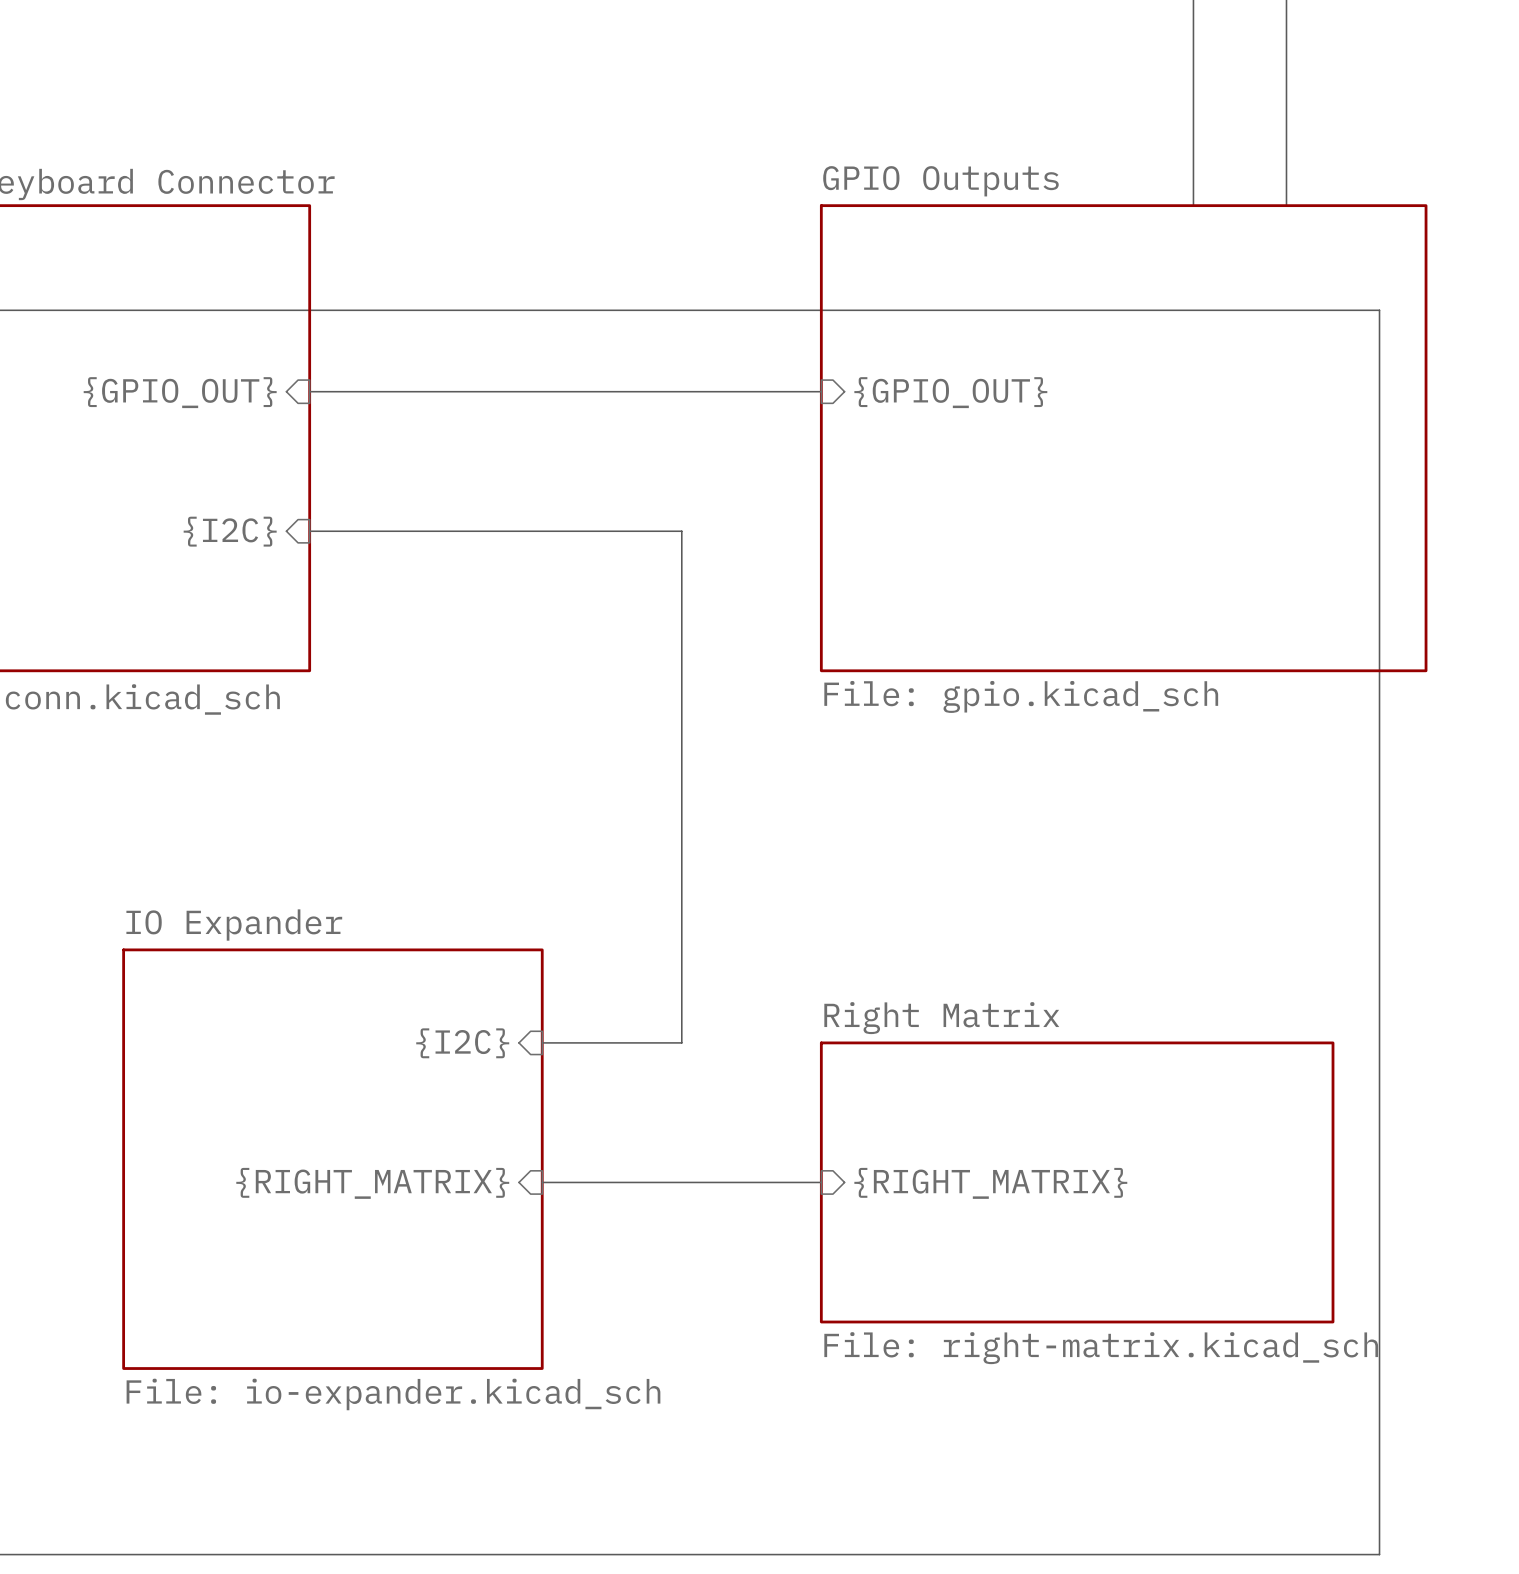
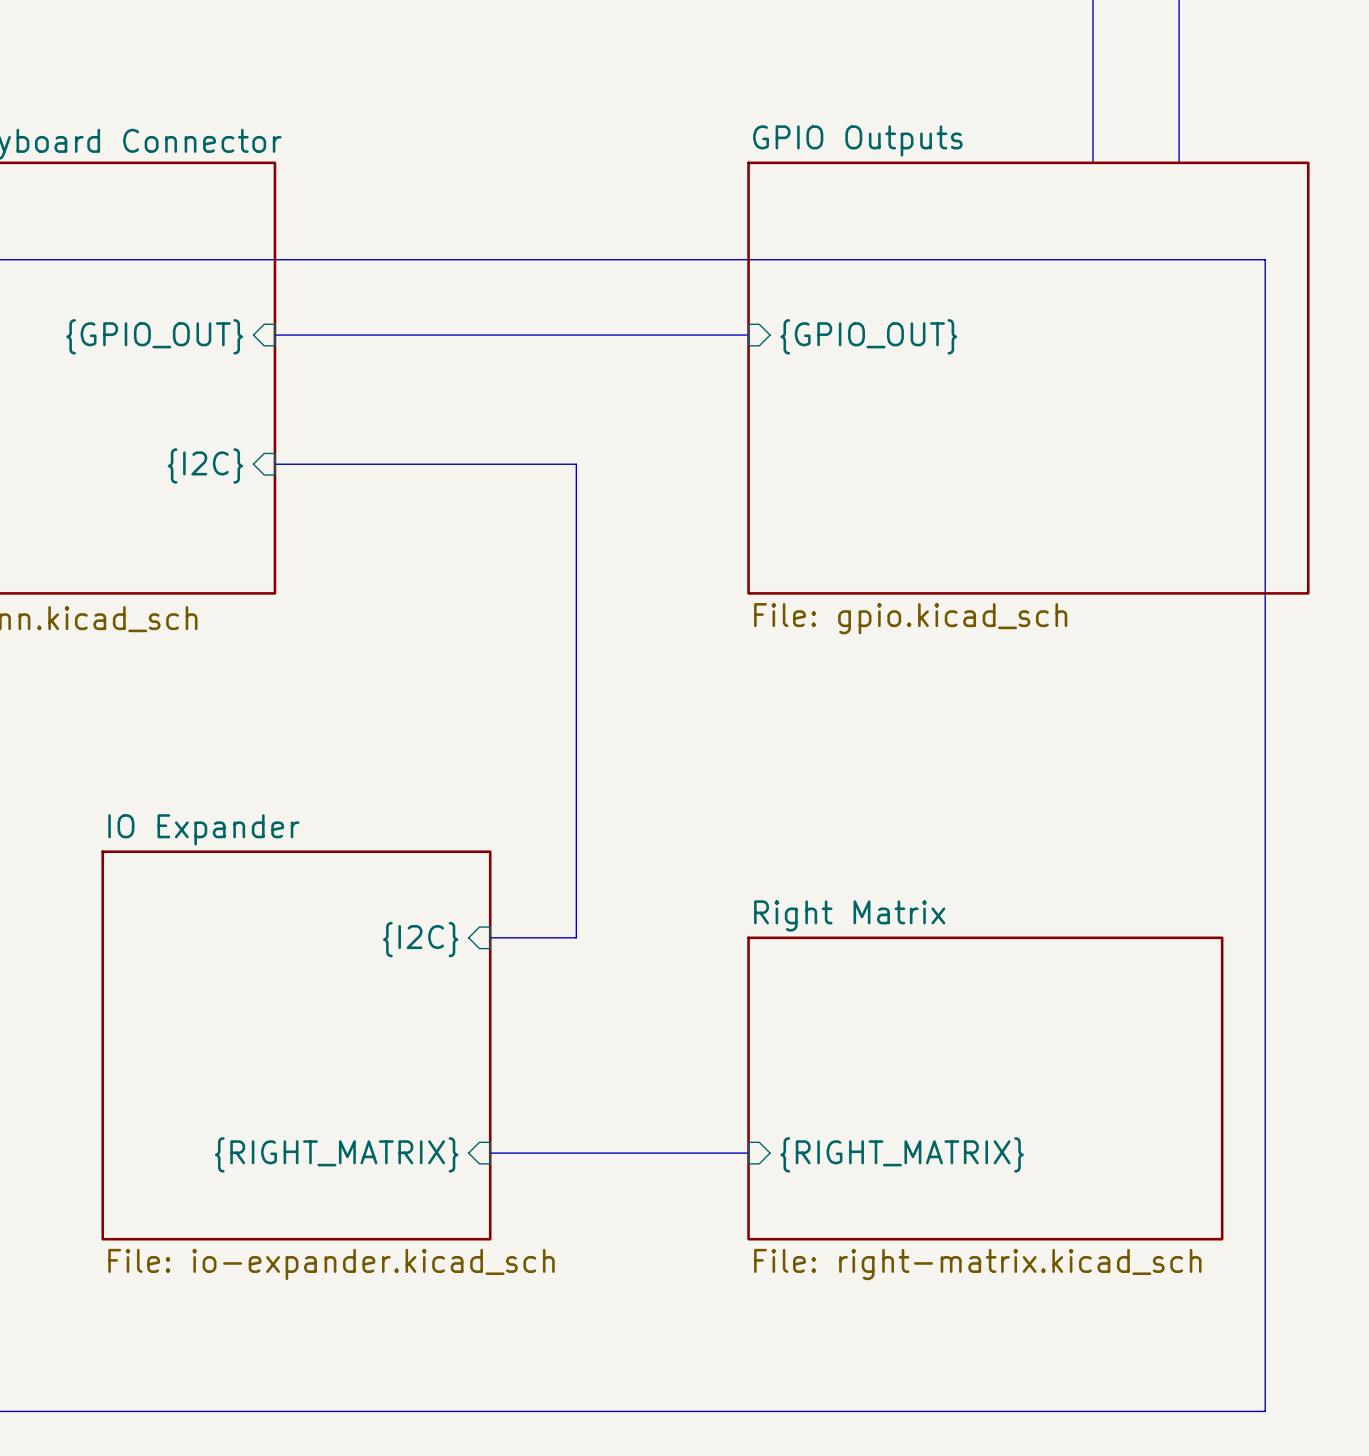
bus: (635, 531) (681, 531) (681, 1042) (635, 1042) -> (576, 464) (576, 937)
bus: (542, 1182) (821, 1182) -> (490, 1153) (748, 1153)
sheet Right Matrix: File: right-matrix.kicad_sch (1077, 1182) -> none
sheet pin position: {RIGHT_MATRIX} (372, 1183) -> {RIGHT_MATRIX} (336, 1154)
sheet pin position: {RIGHT_MATRIX} (990, 1183) -> {RIGHT_MATRIX} (902, 1154)
sheet Right Matrix: none -> File: right-matrix.kicad_sch (985, 1088)

